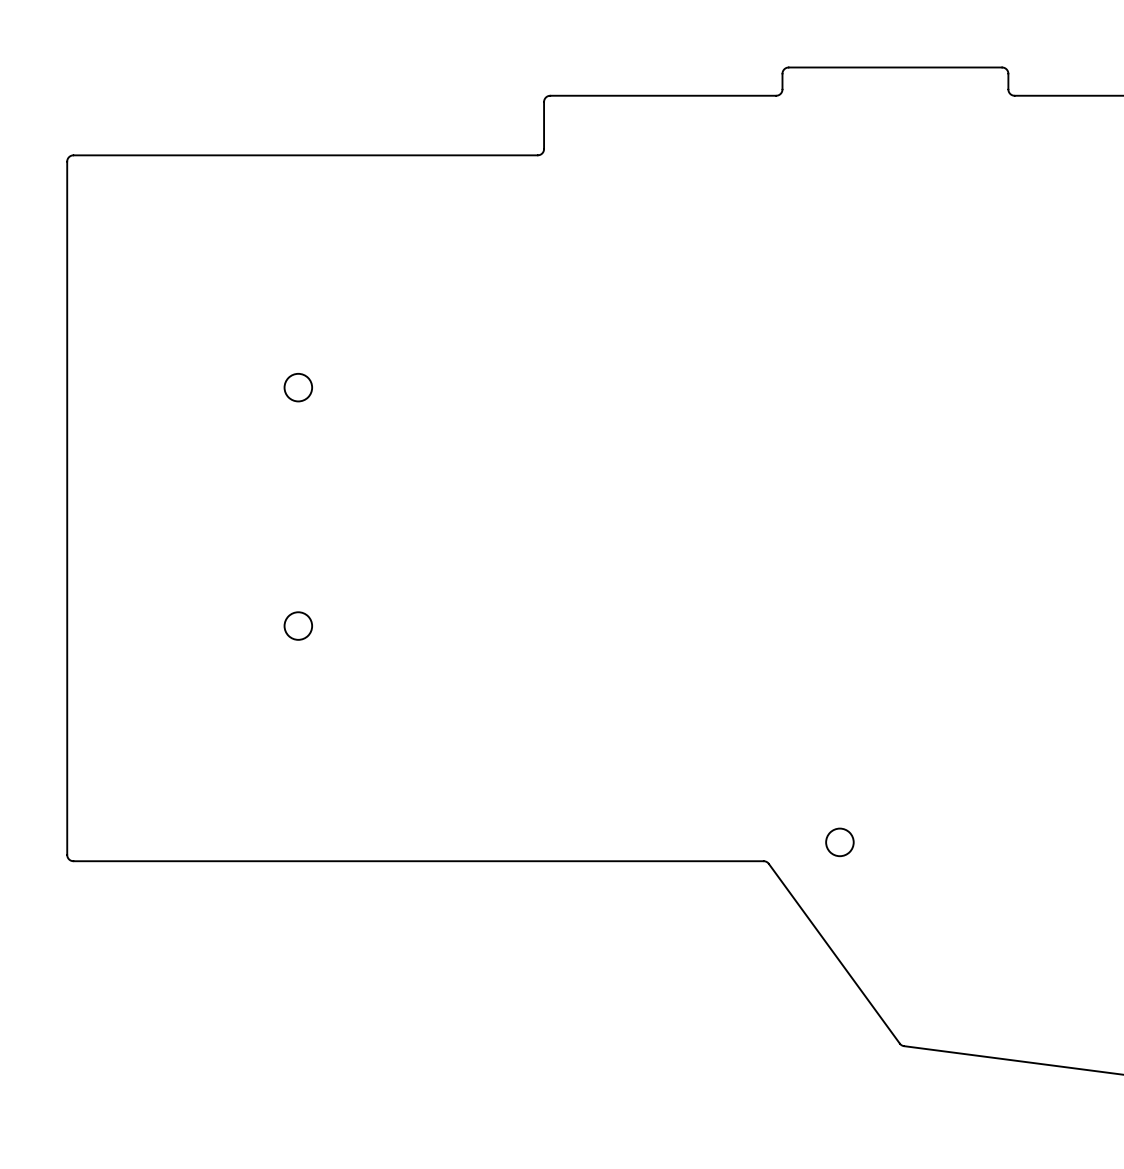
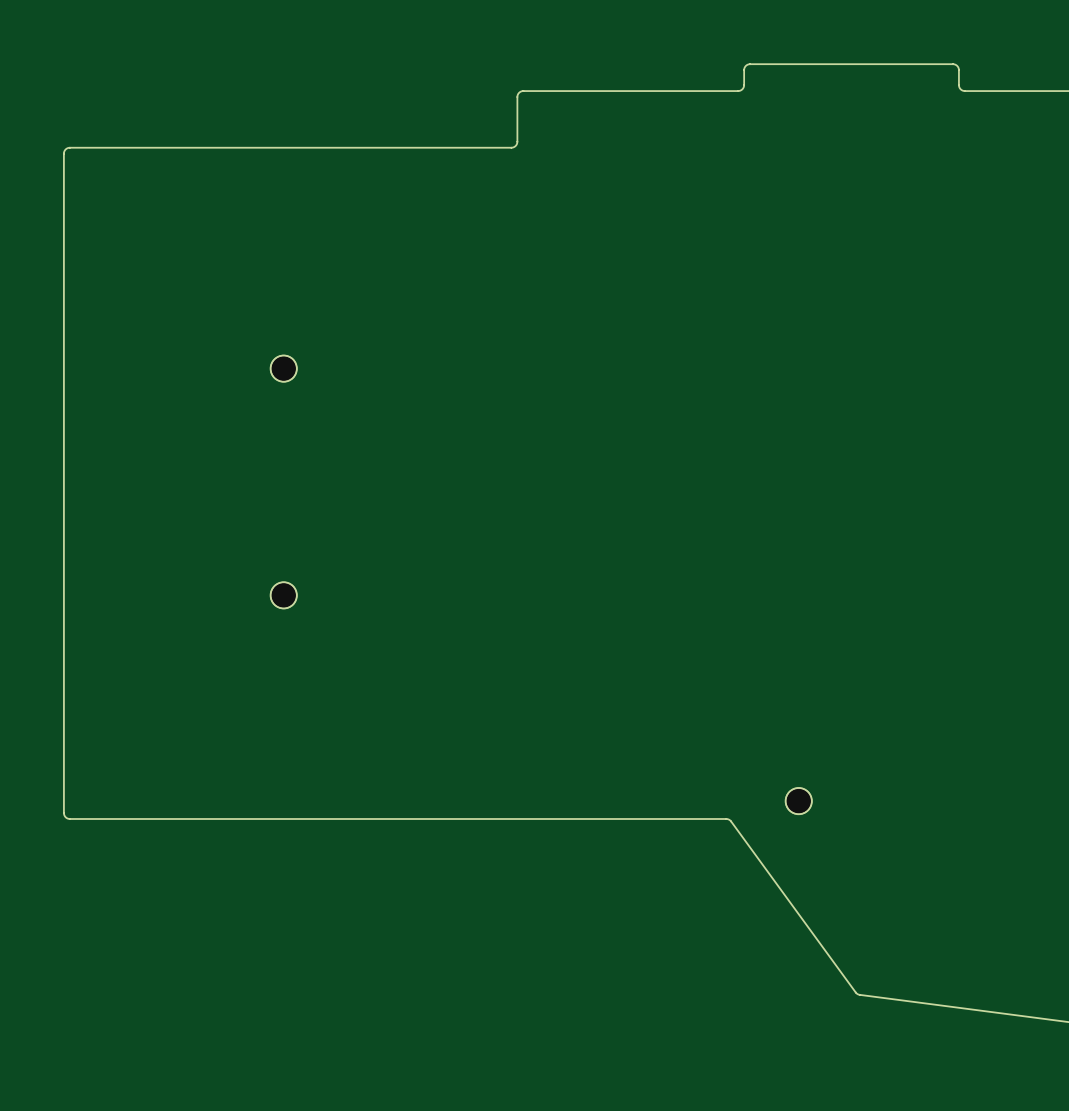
part: none -> (283, 368)
part: none -> (283, 595)
part: none -> (798, 801)

